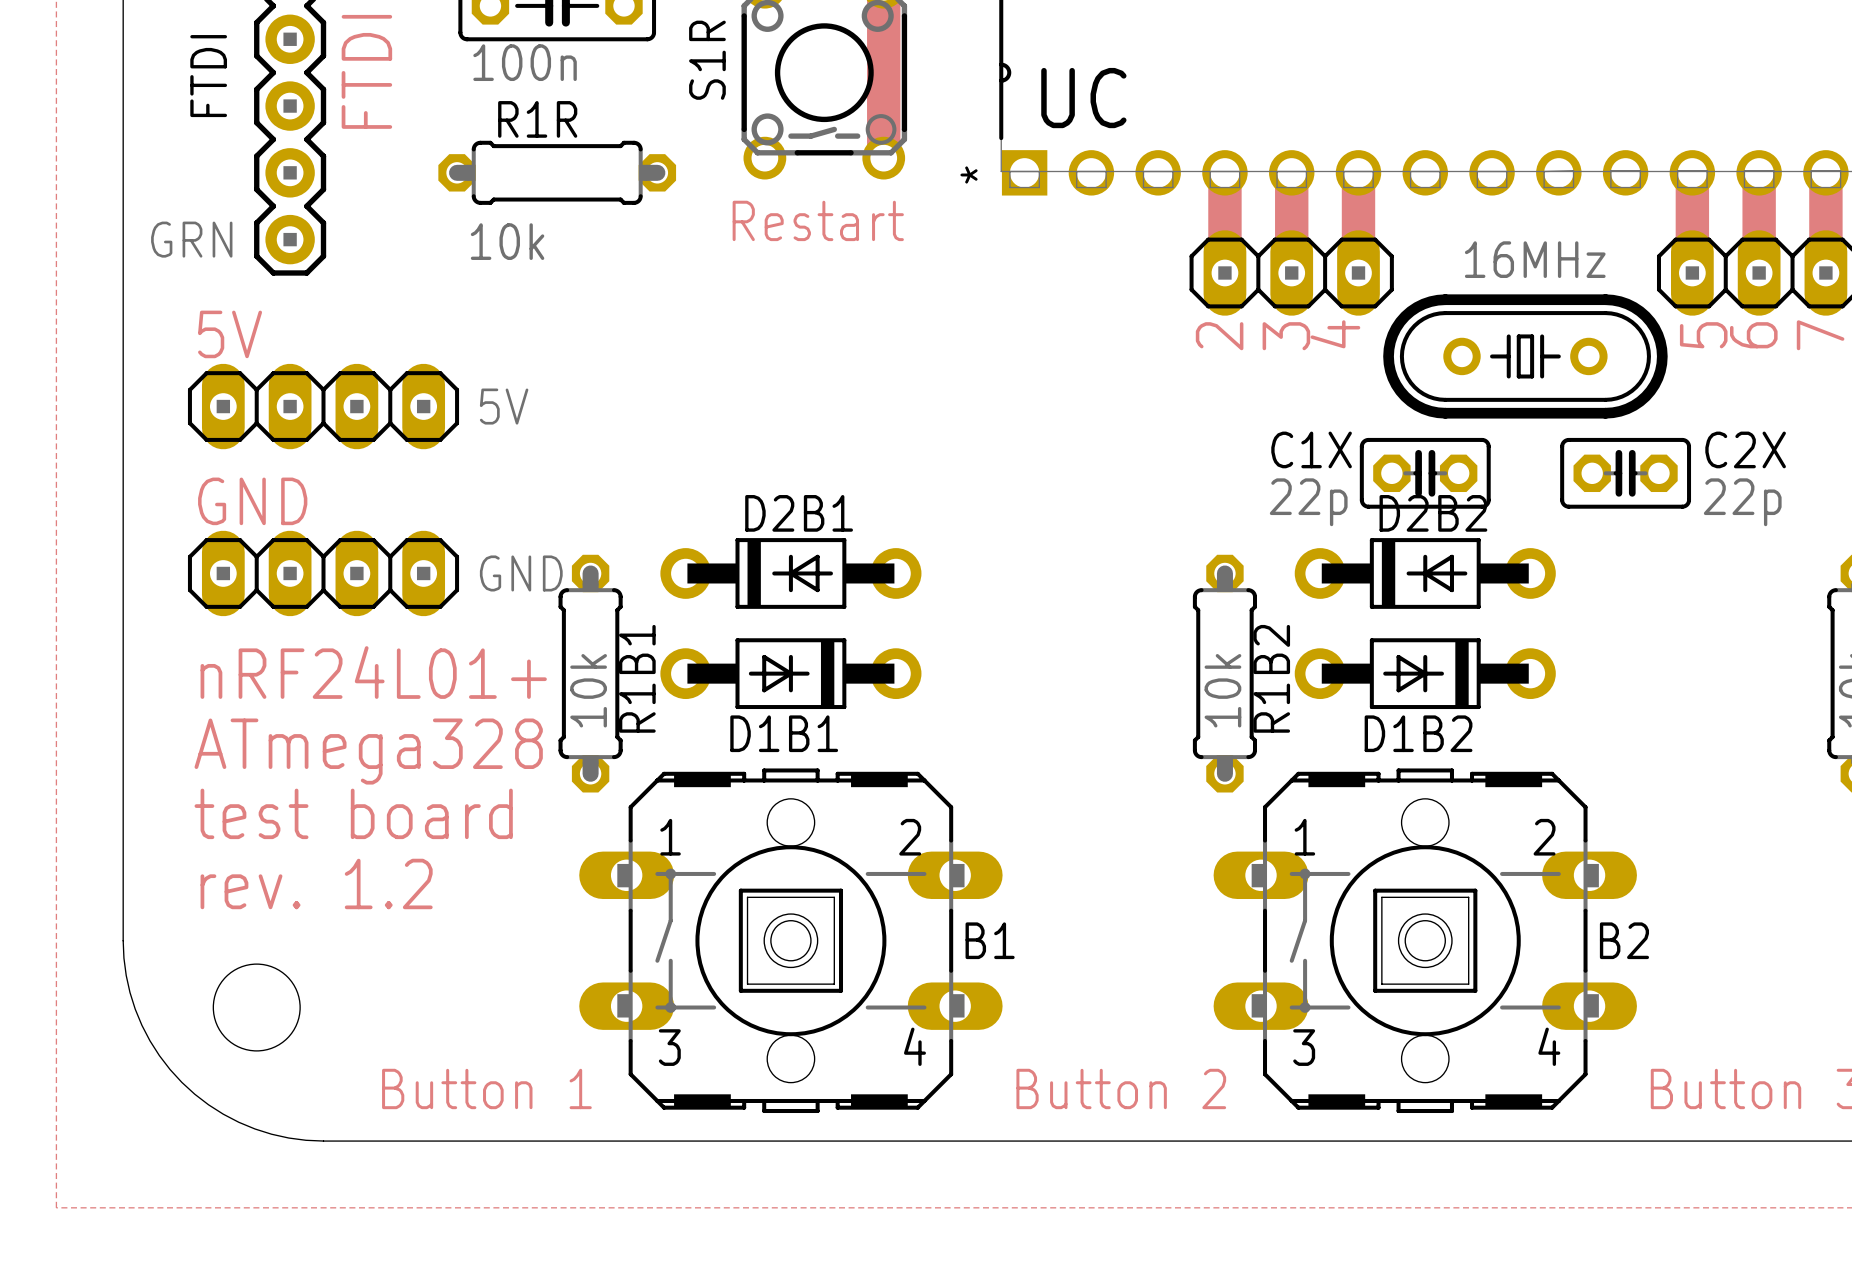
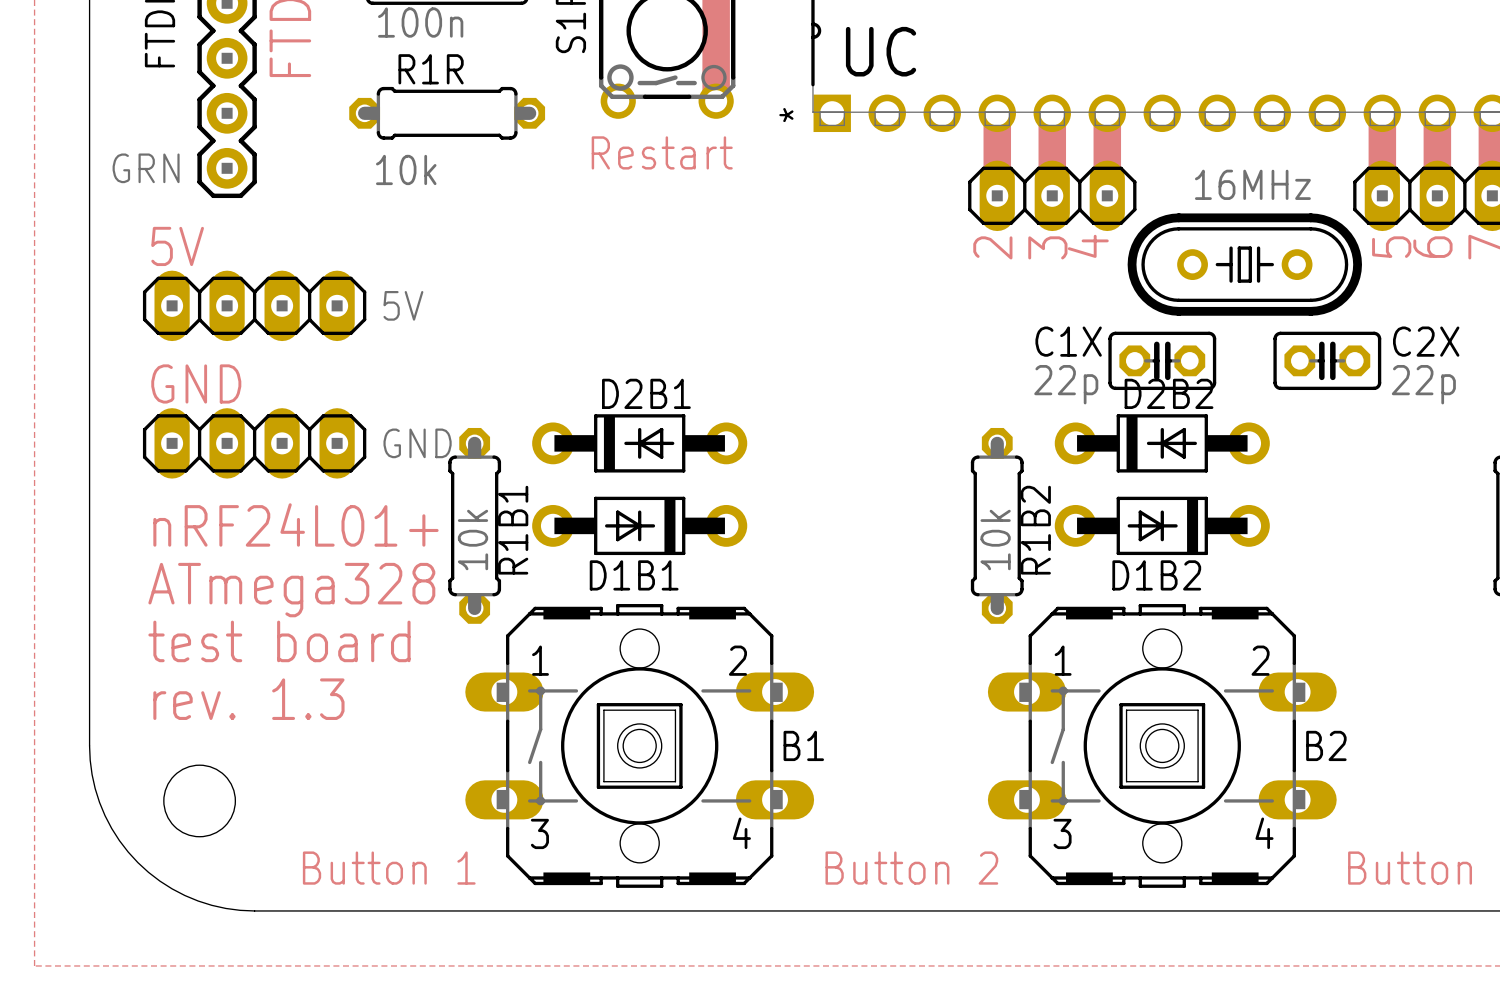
text: rev. 1.2 (316, 883) -> rev. 1.3 (248, 699)

